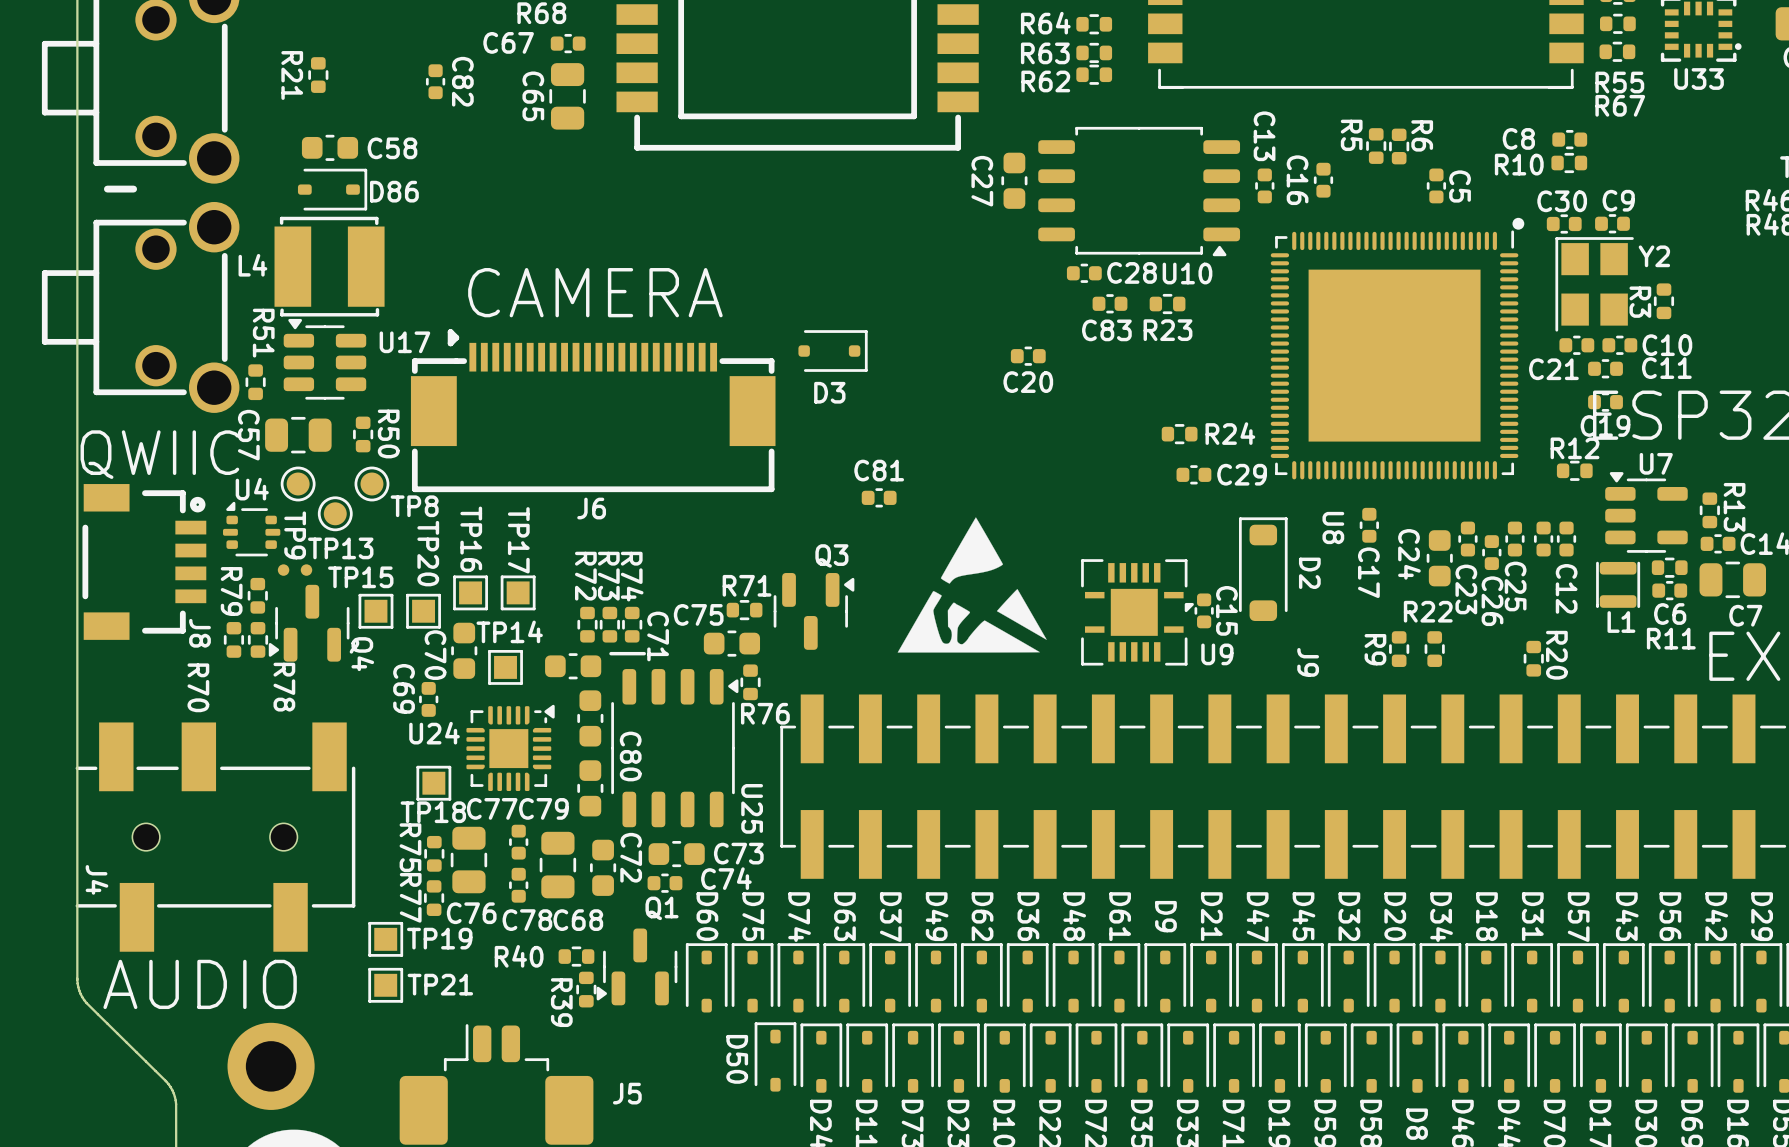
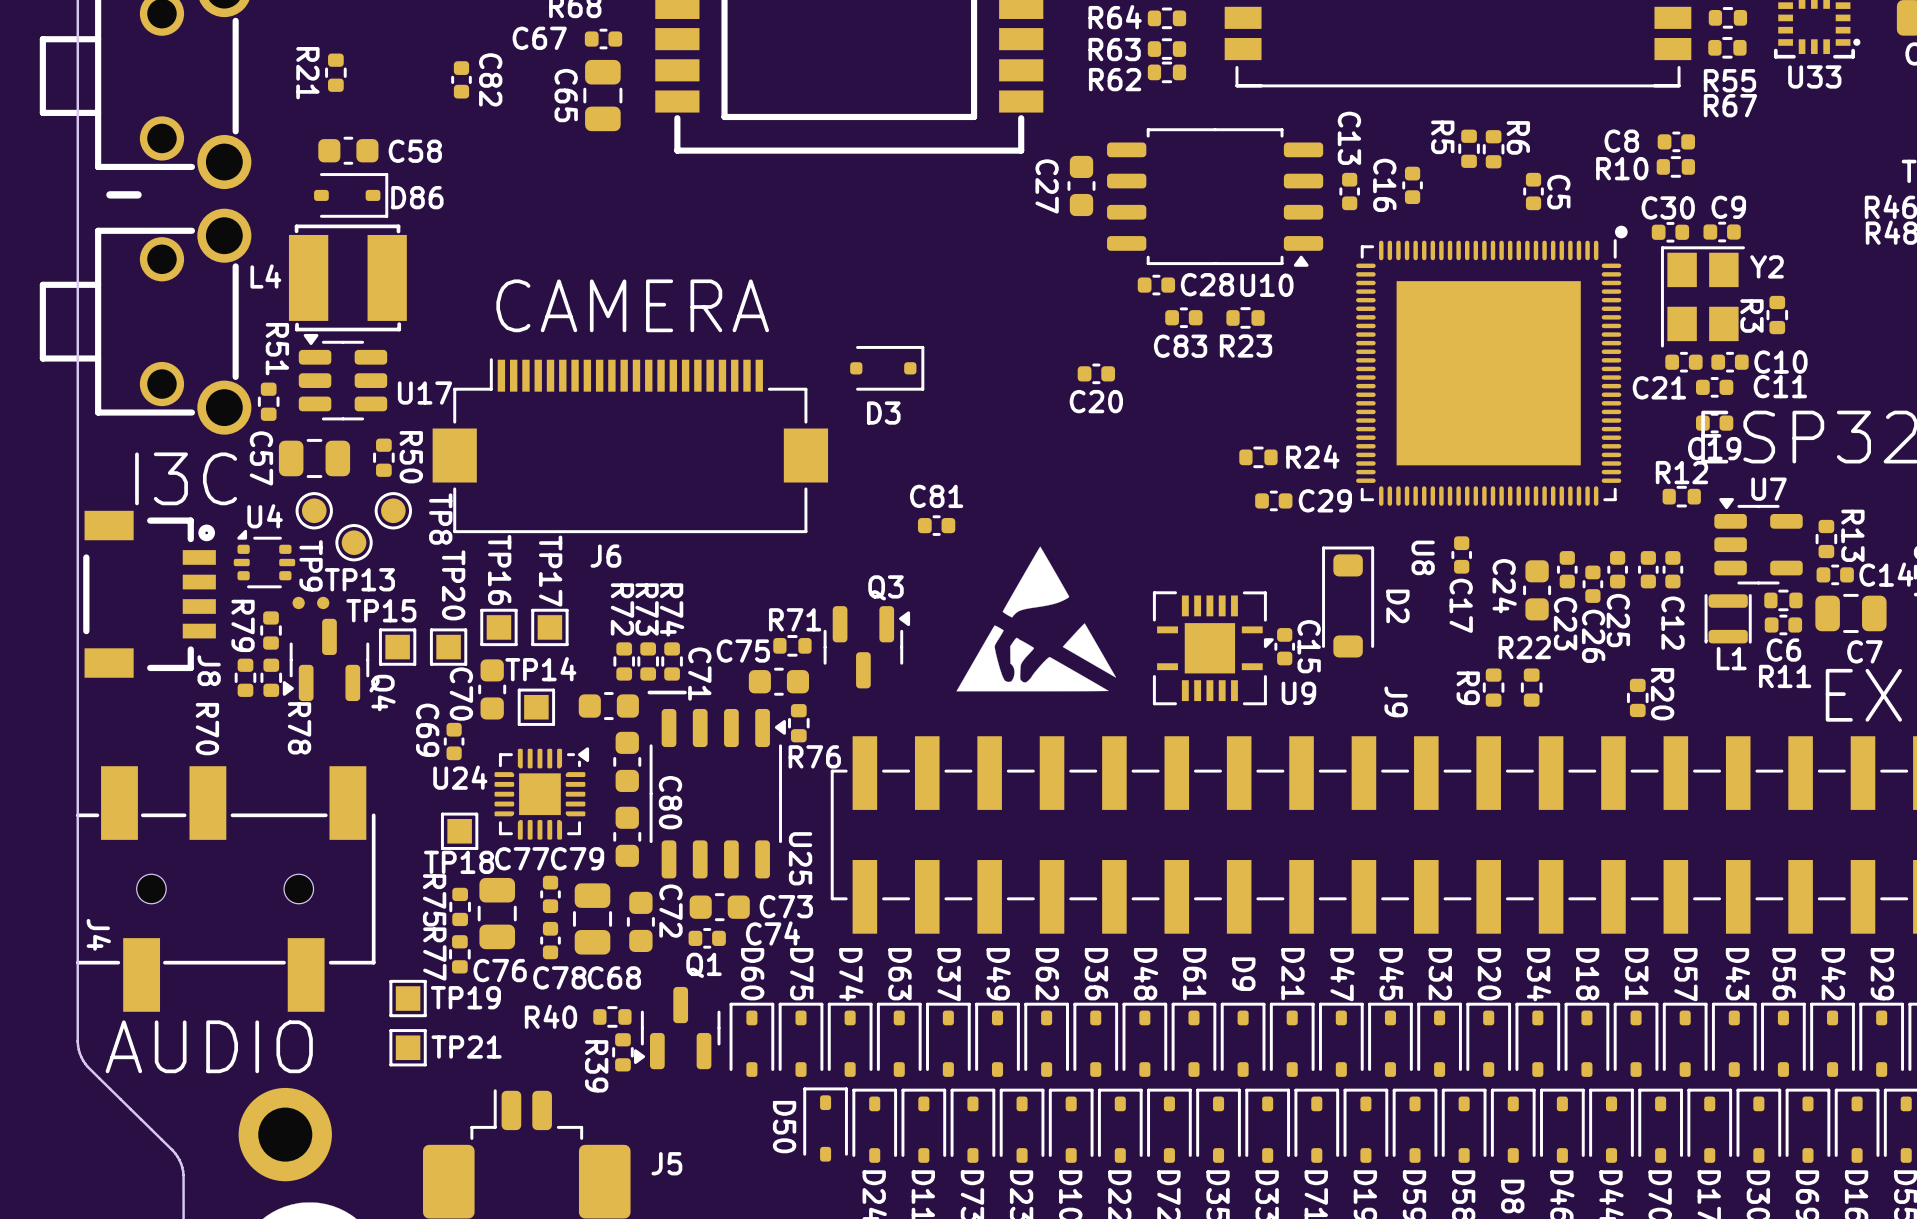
J6 footprint: [410, 329, 776, 493] -> [432, 358, 829, 534]
U17 name position: U17 (404, 342) -> U17 (424, 393)
text: QWIIC (159, 454) -> I3C (186, 478)
TP8 name rotation: 0° (414, 506) -> 90° clockwise (440, 519)

